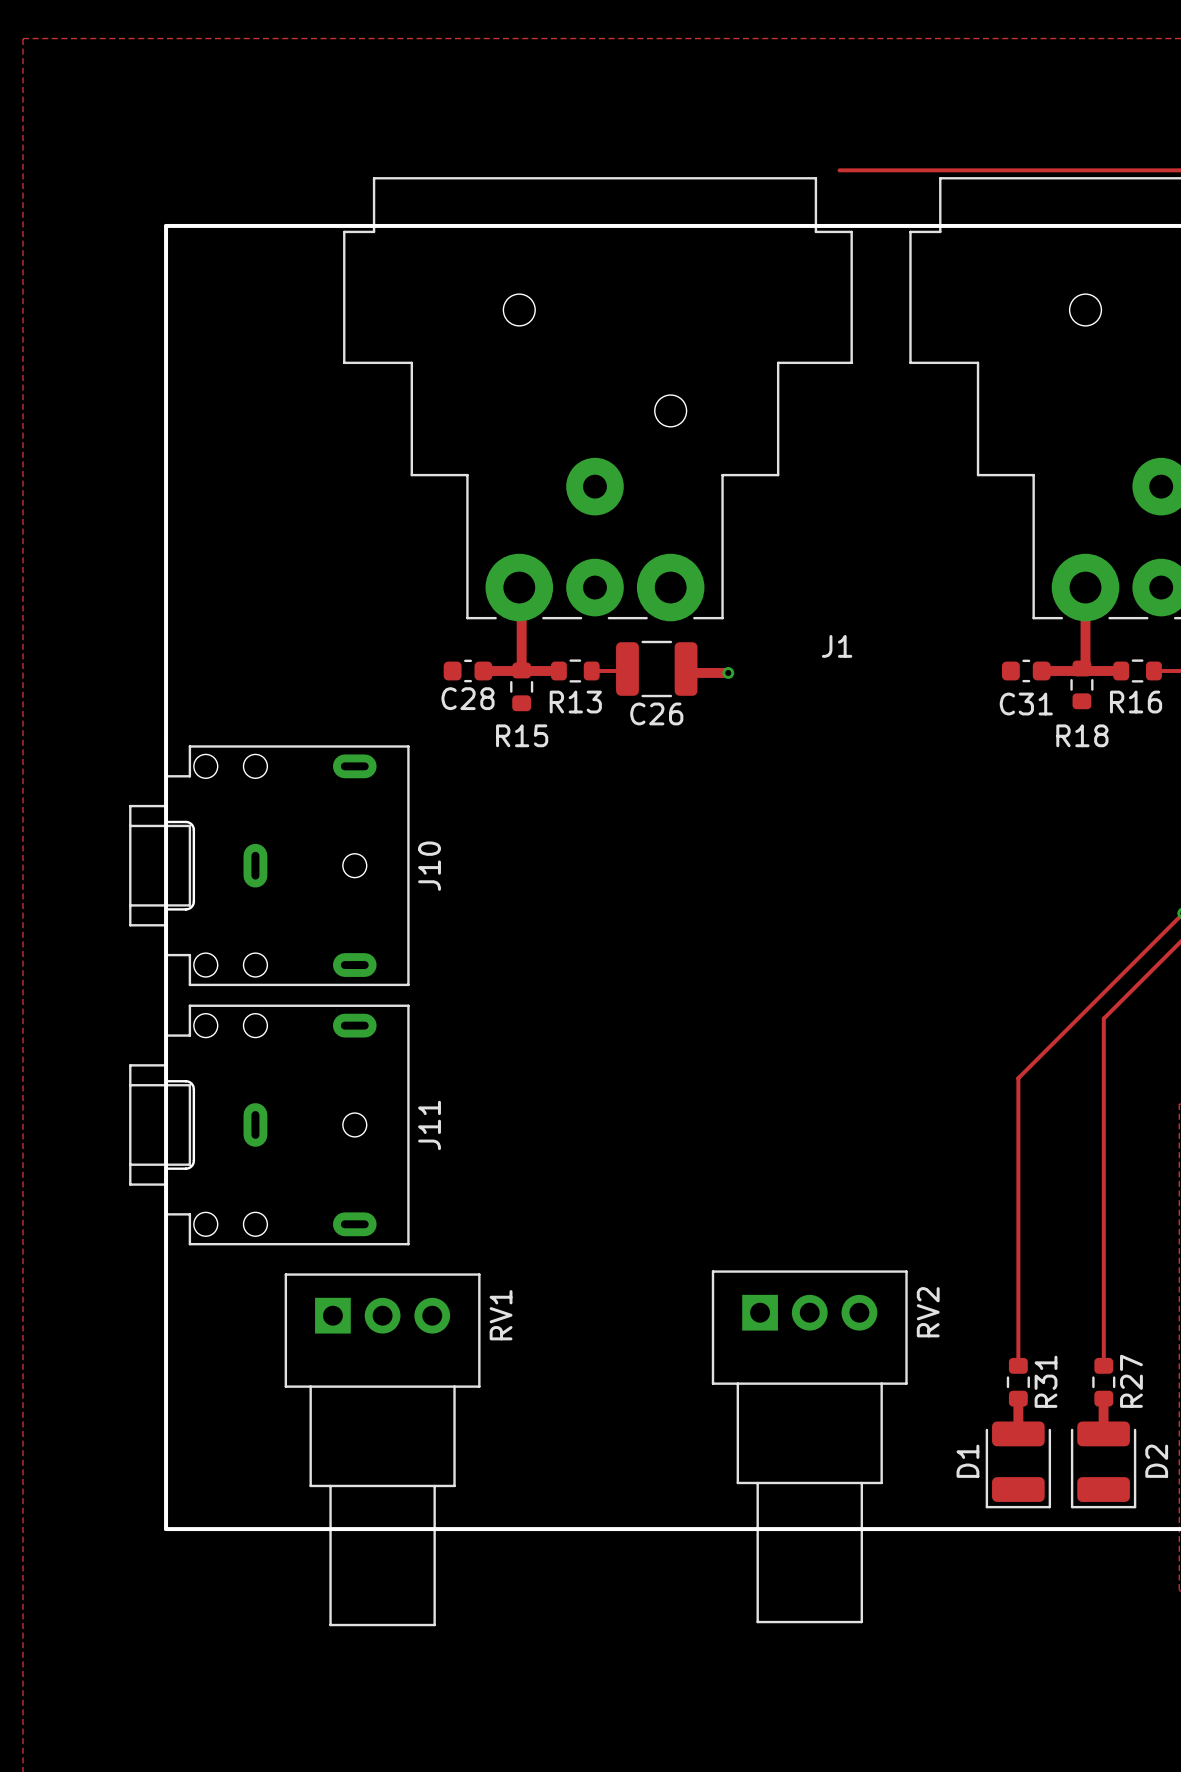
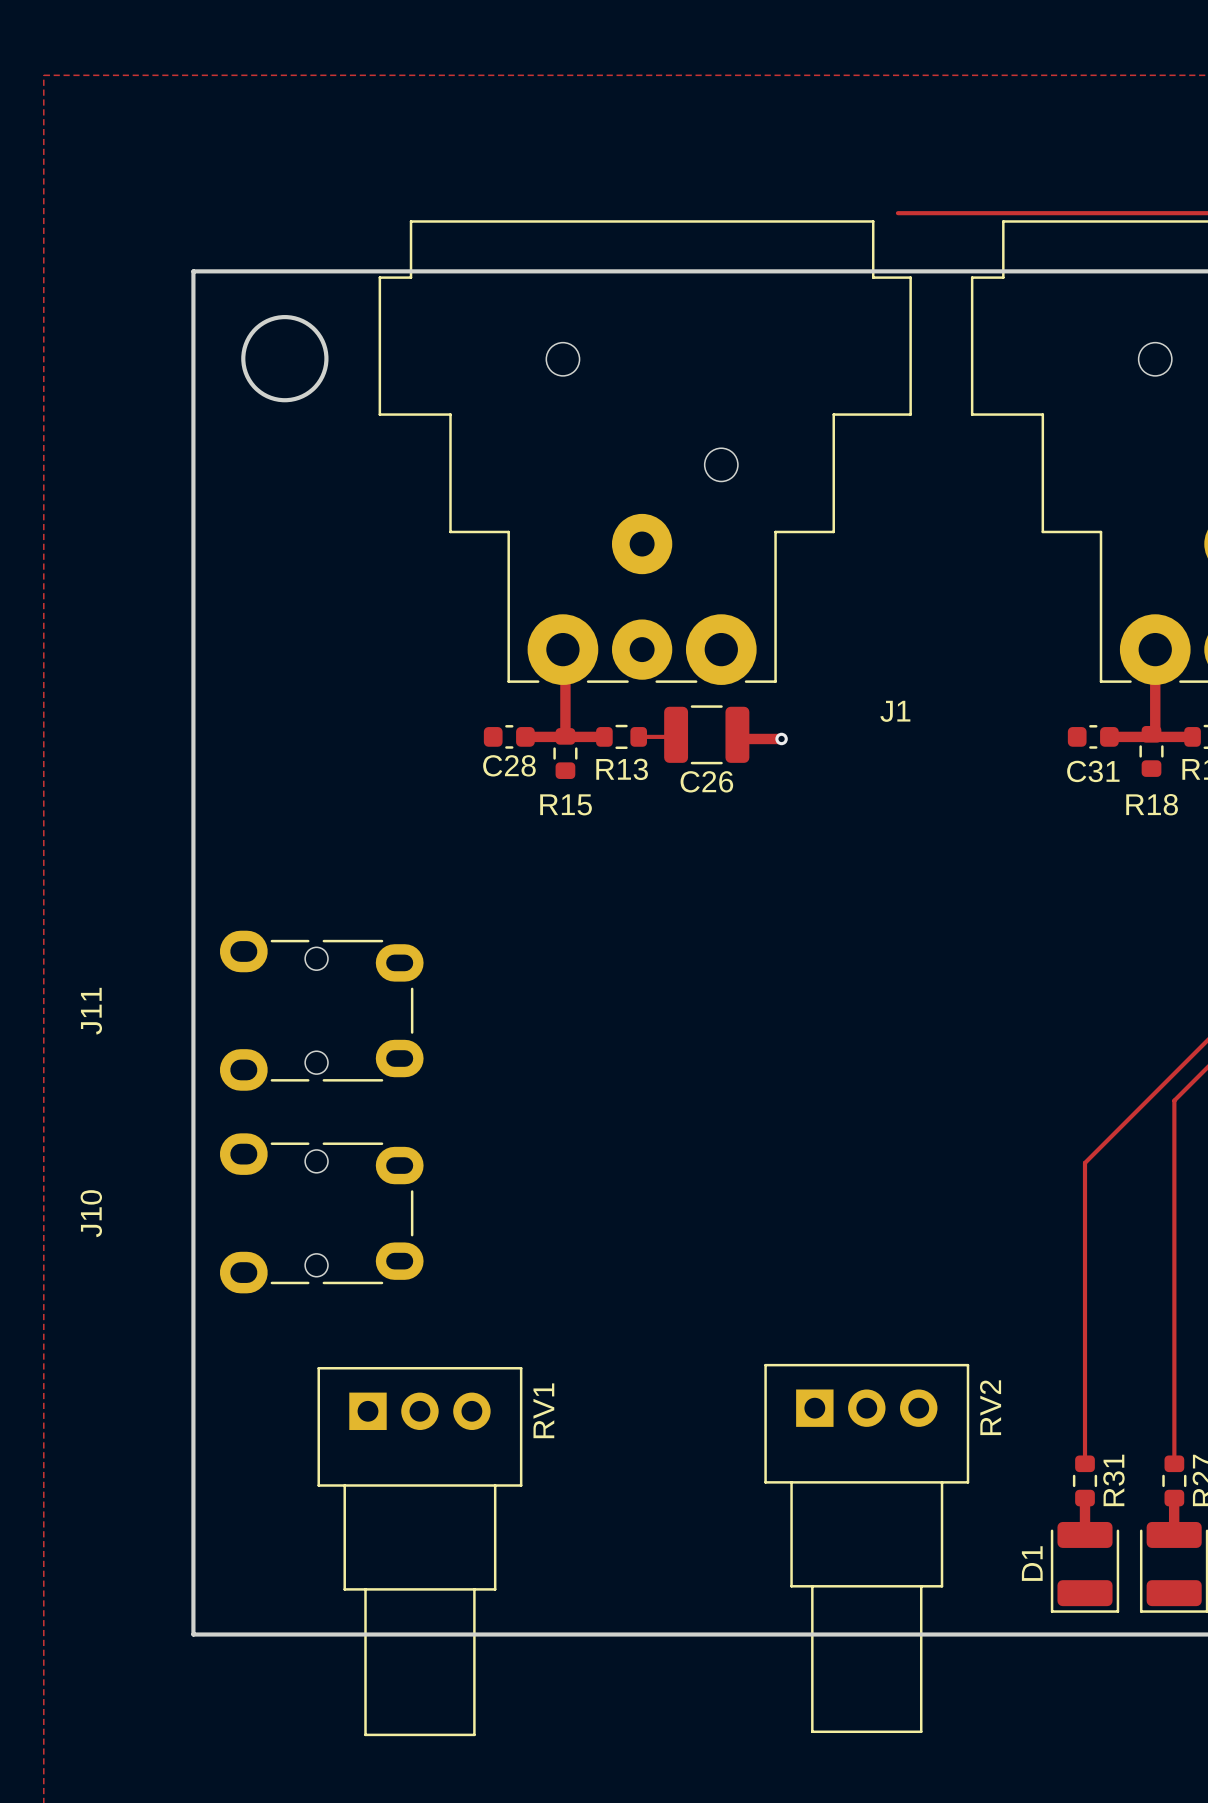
round board edge: none -> [241, 315, 329, 403]
J10 footprint: [129, 735, 410, 997] -> [219, 1133, 424, 1294]
J10 name position: J10 (429, 866) -> J10 (91, 1213)
J11 footprint: [129, 994, 410, 1256] -> [219, 930, 424, 1091]
J11 name position: J11 (429, 1125) -> J11 (91, 1011)

